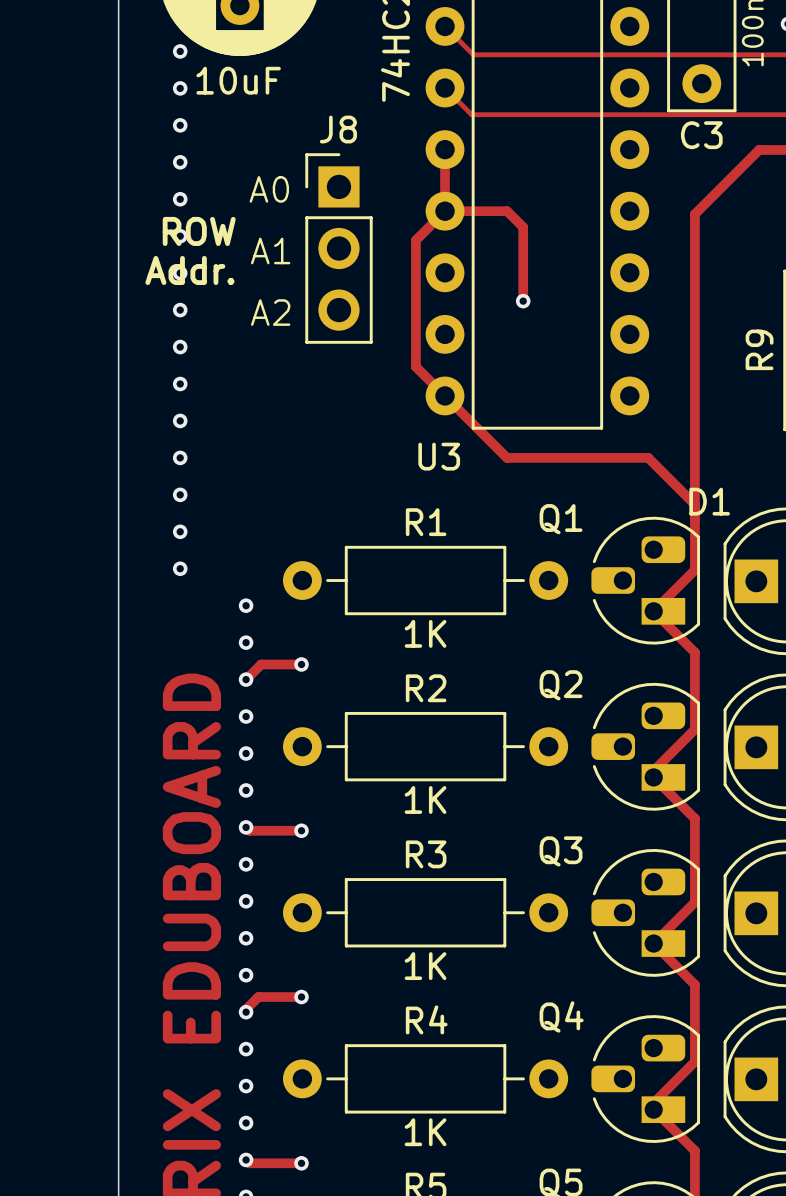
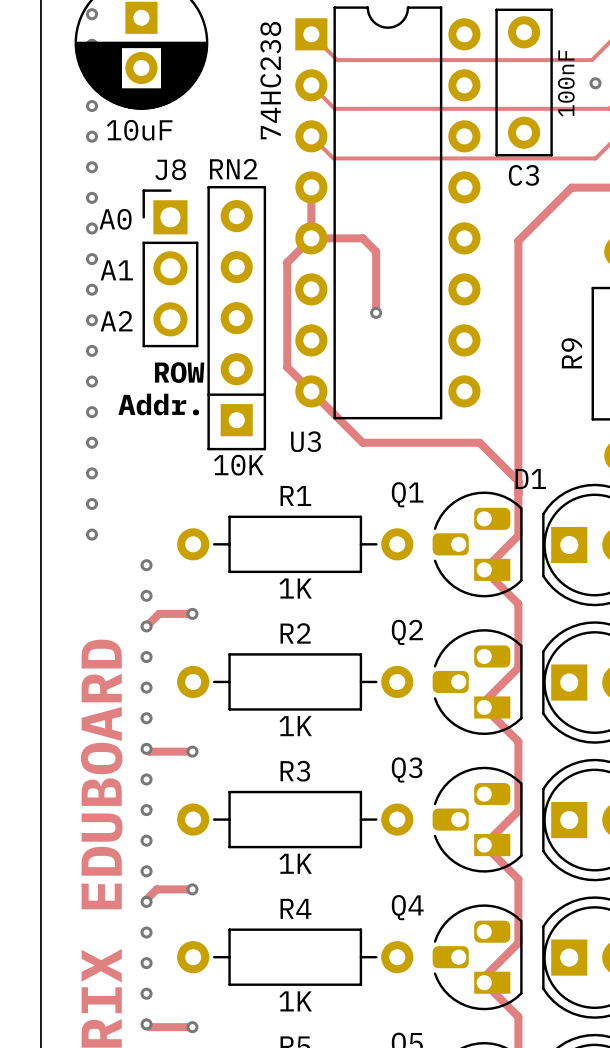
text position: A0 (269, 189) -> A0 (115, 219)
text position: ROW (199, 231) -> ROW (179, 372)
J8 position: (338, 248) -> (170, 268)
text position: A1 (270, 250) -> A1 (116, 270)
text position: Addr. (189, 270) -> Addr. (158, 404)
RN2: none -> 10K (236, 318)
text position: A2 (270, 312) -> A2 (116, 321)

